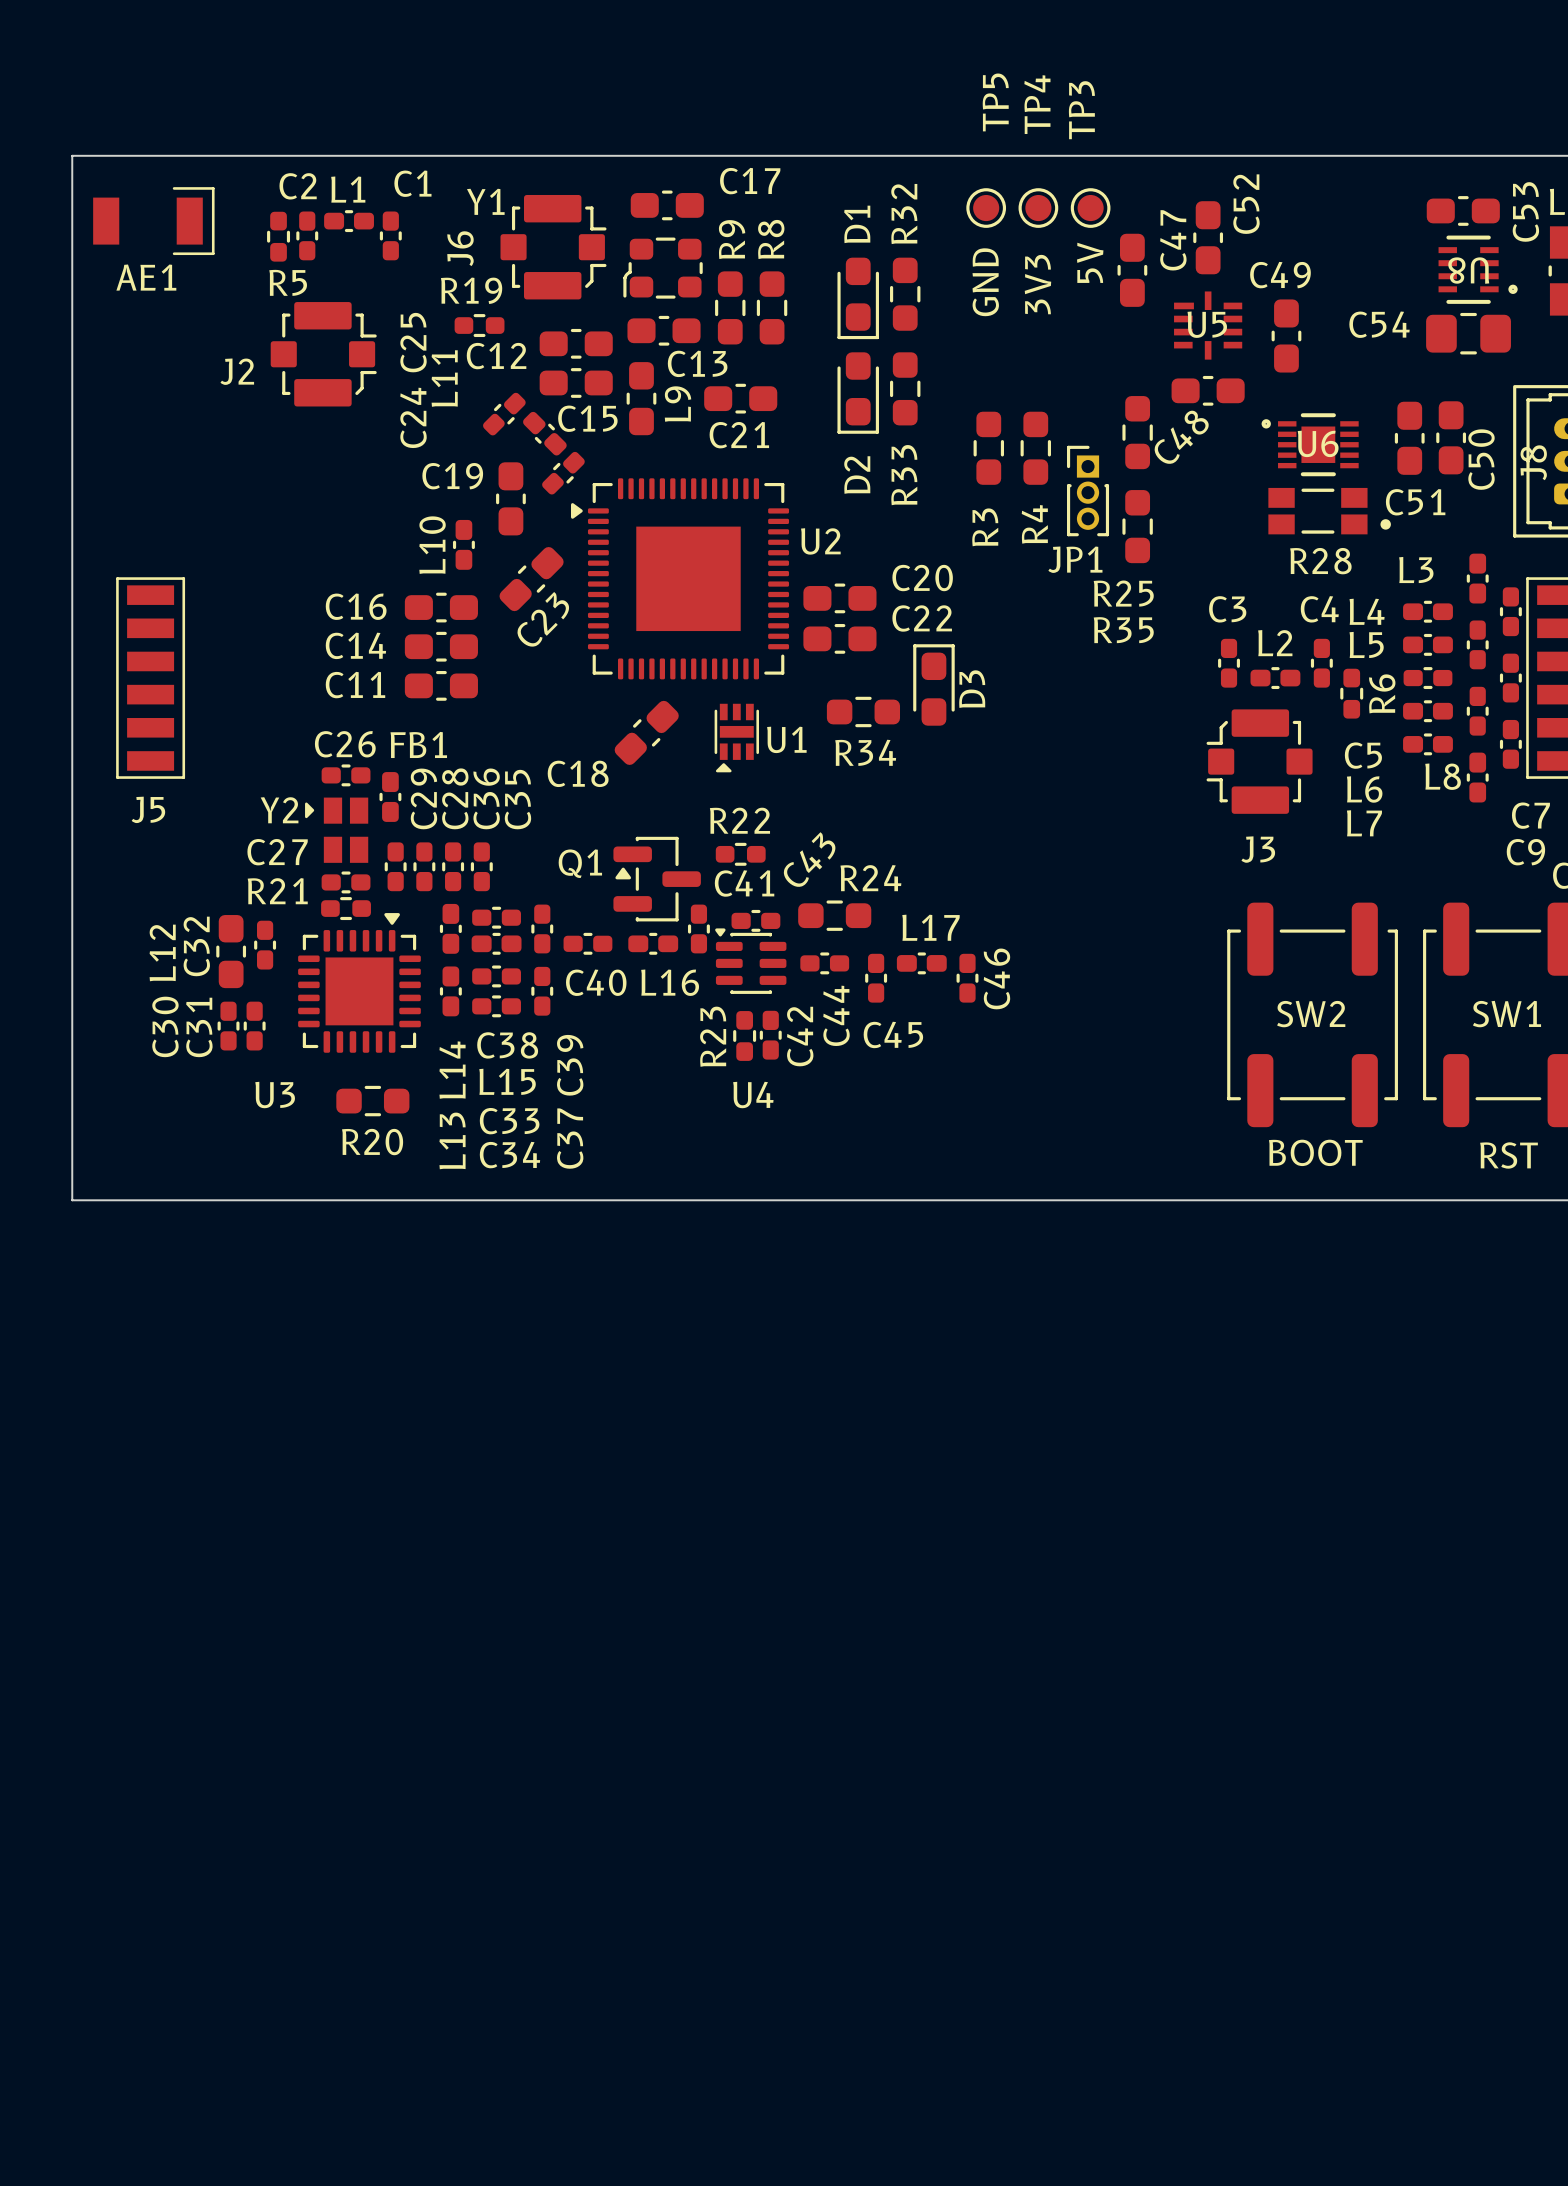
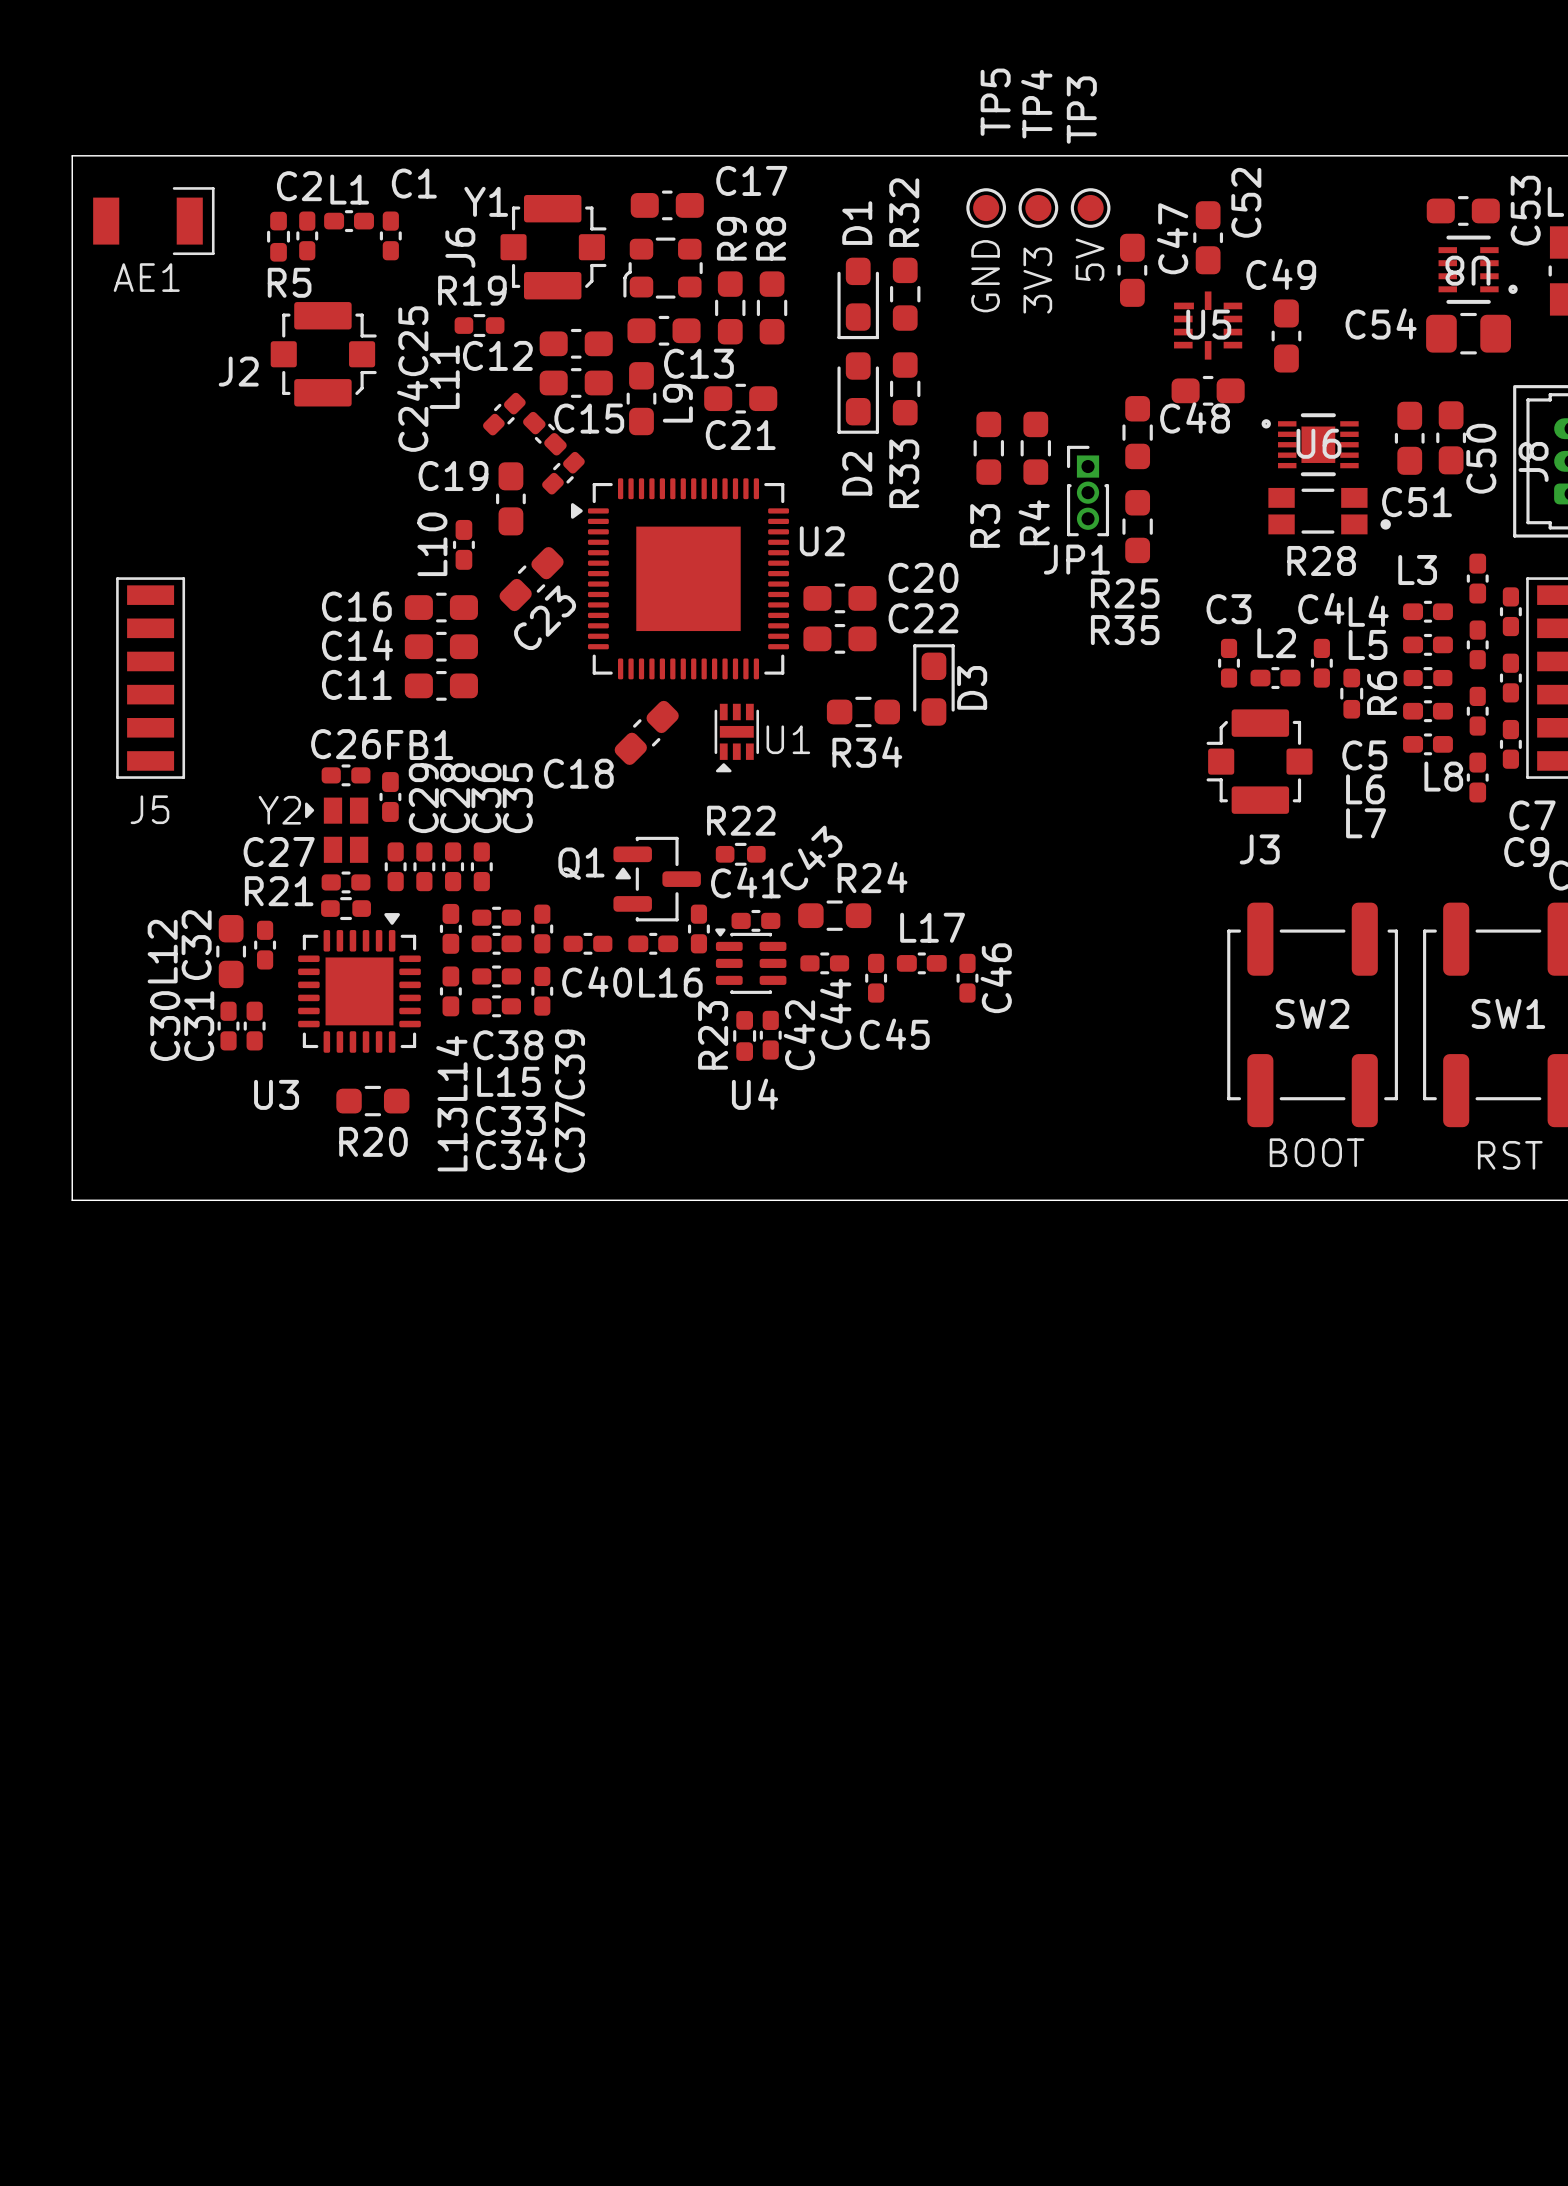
C48 name rotation: 0° (1181, 437) -> 45° clockwise (1195, 417)

